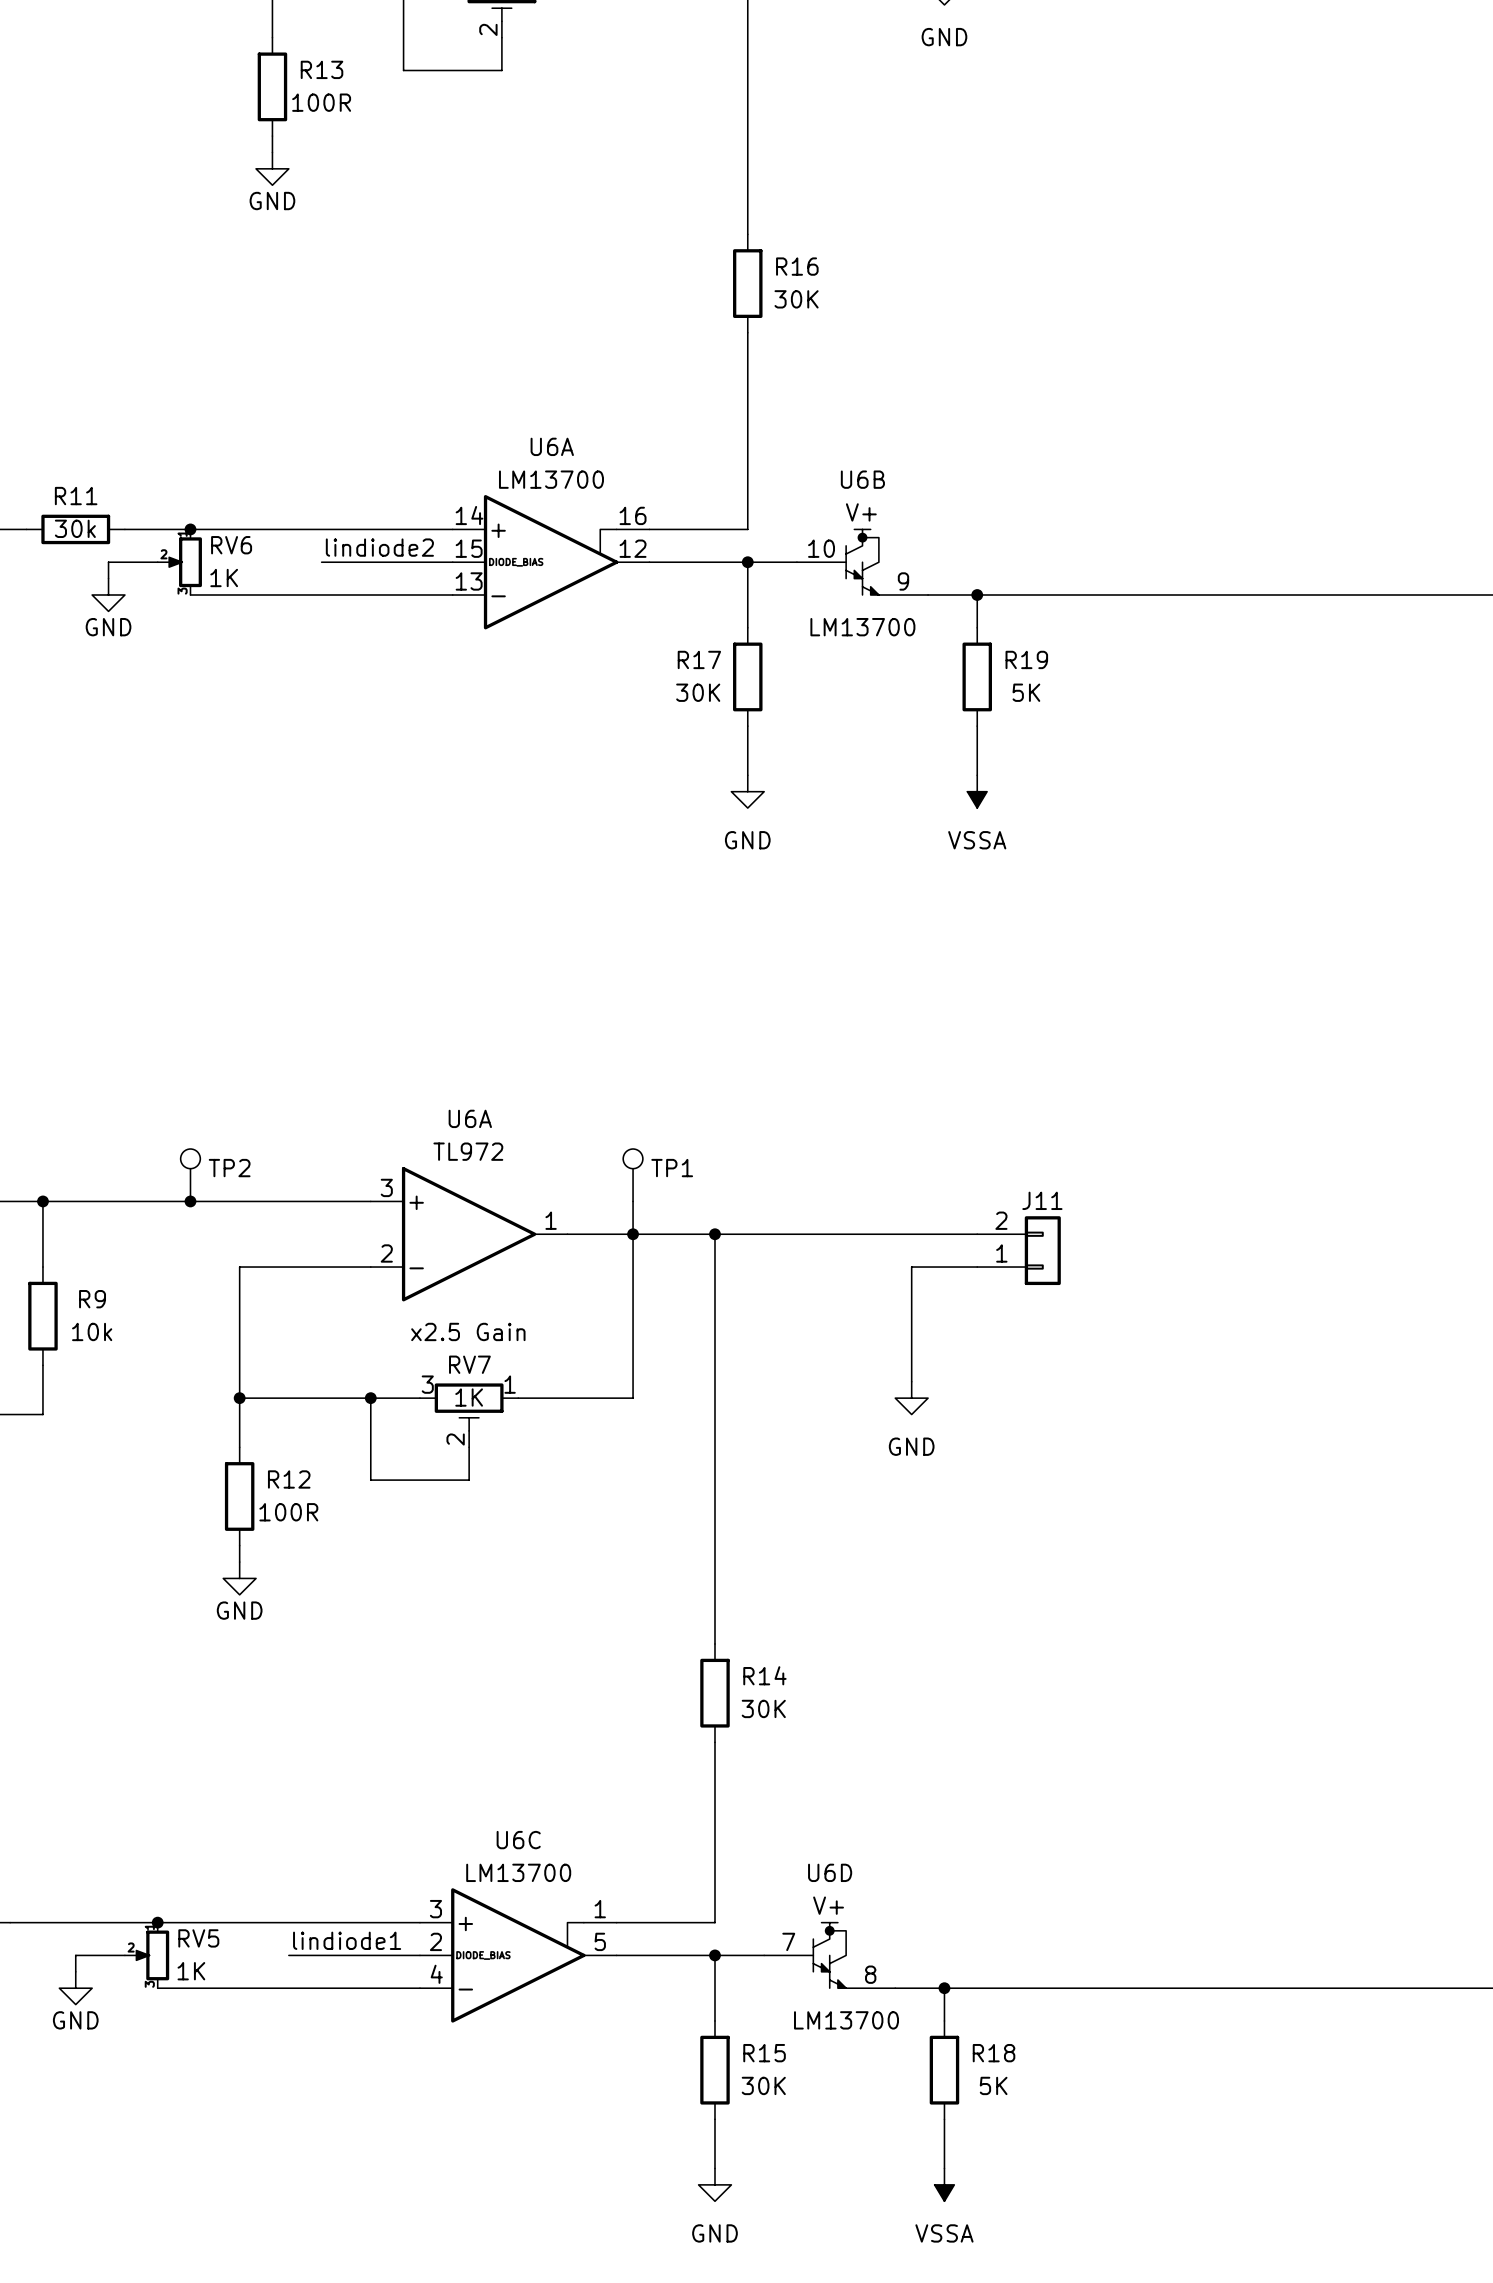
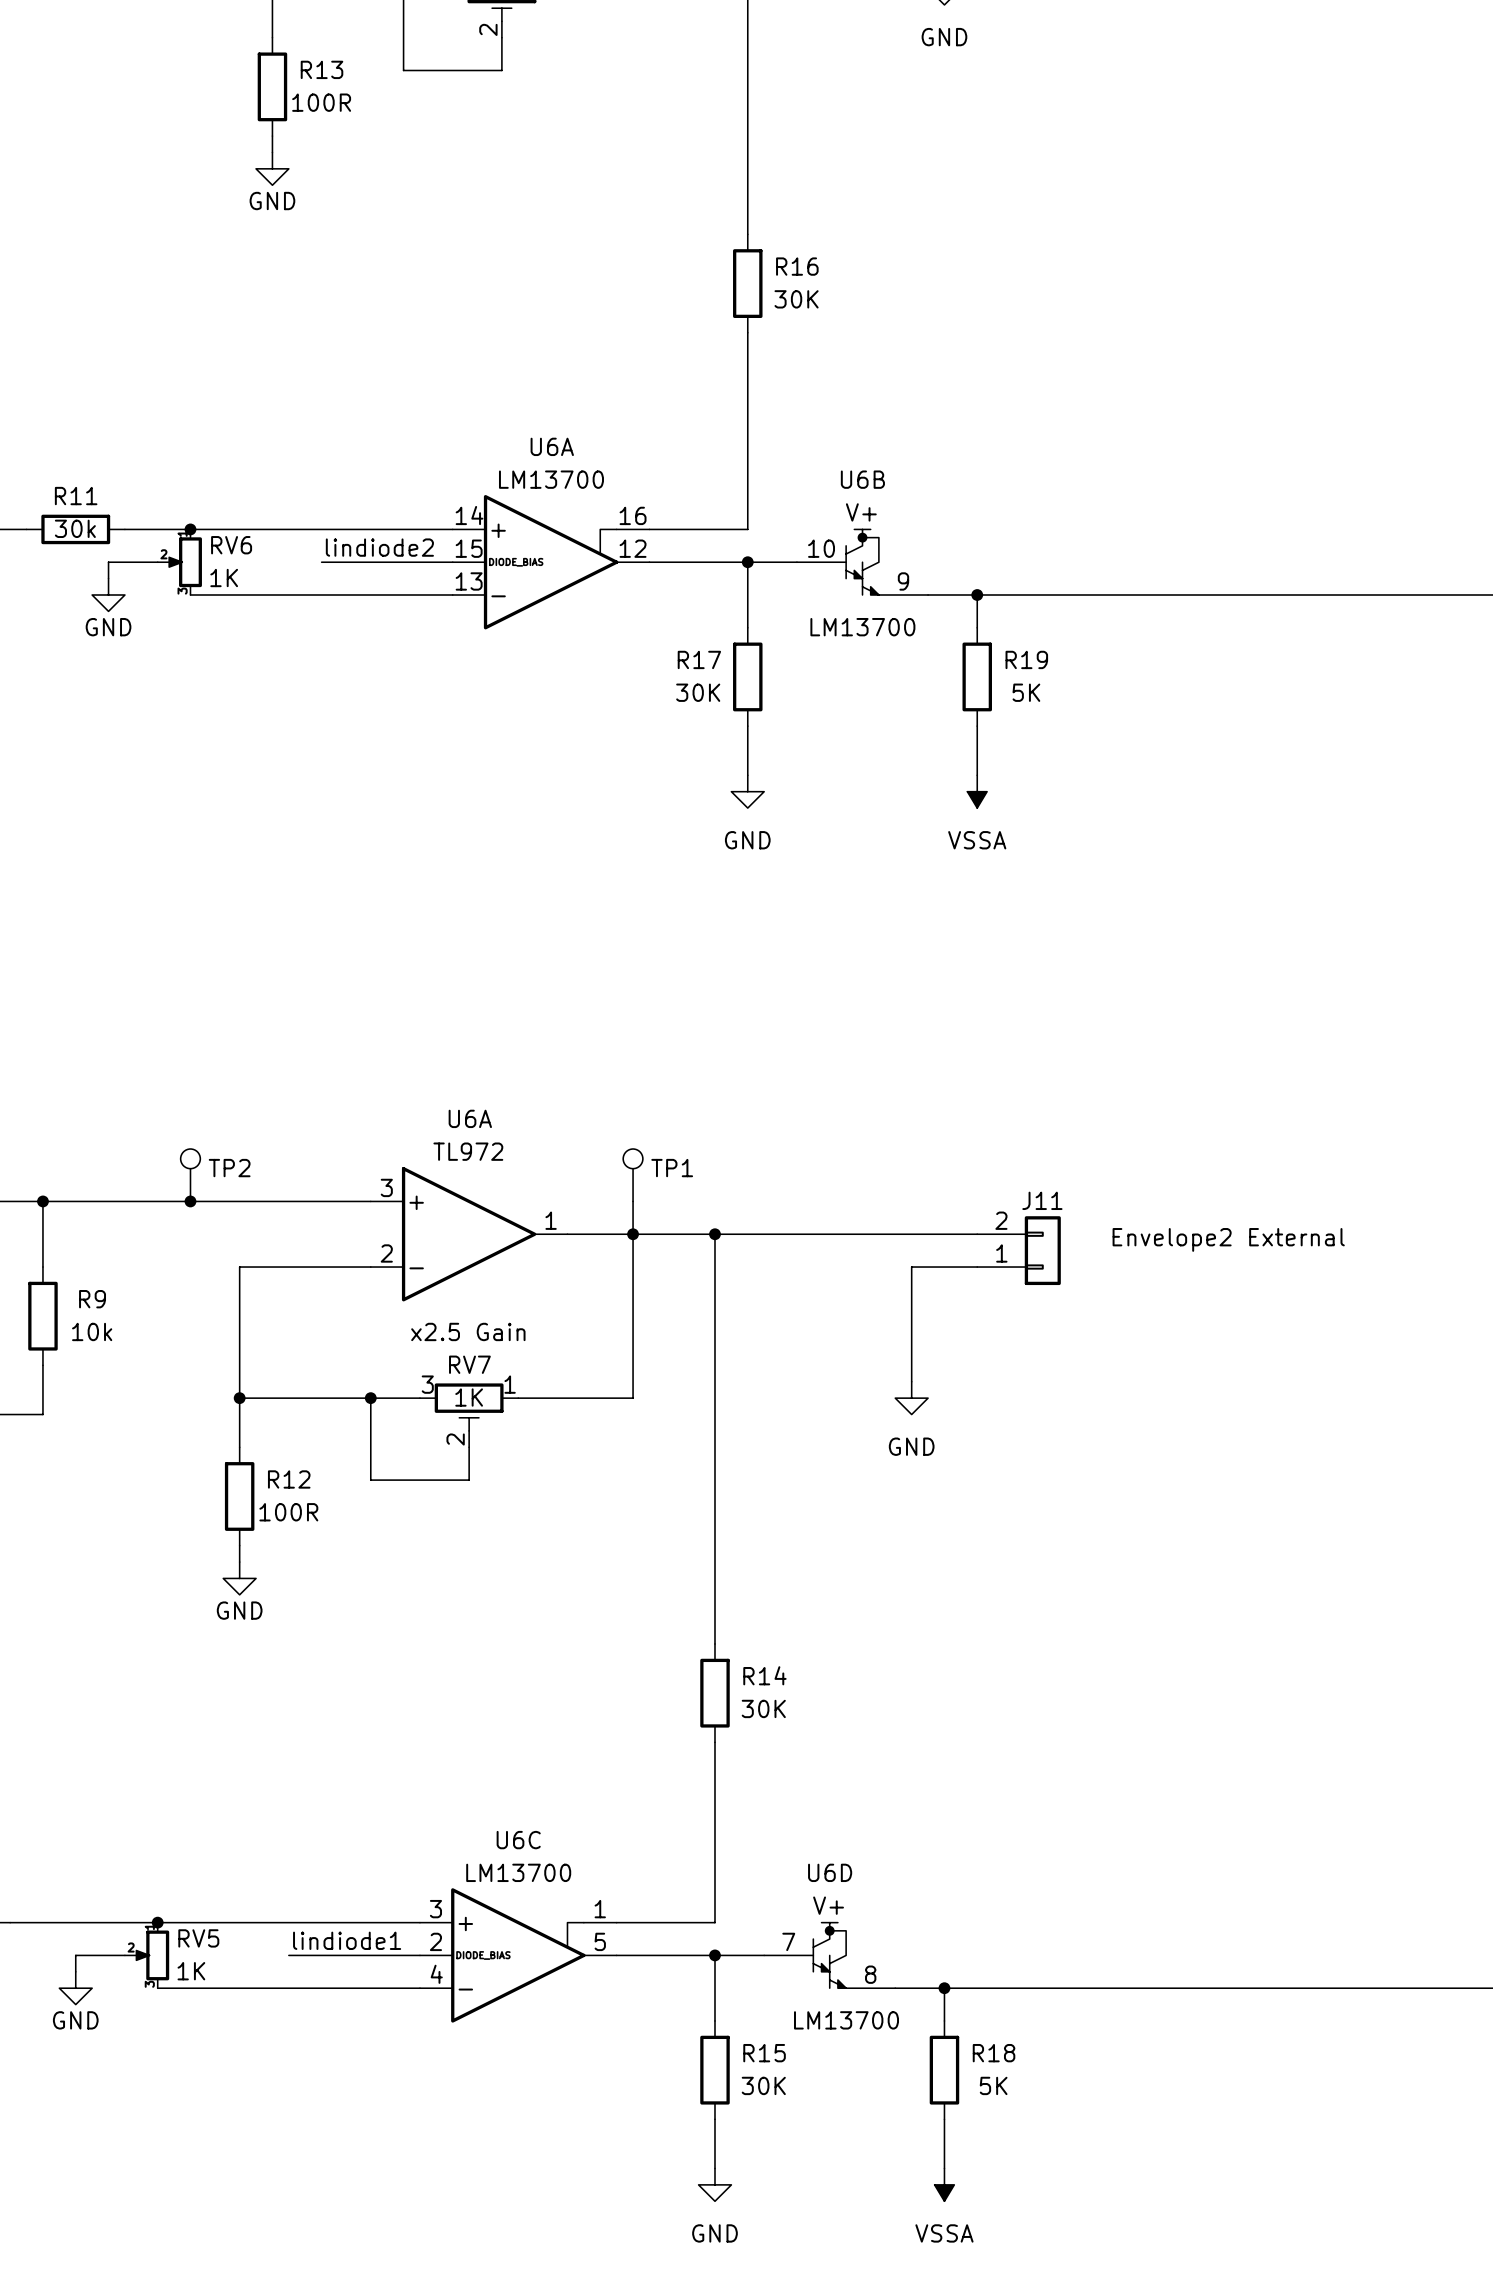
text: none -> Envelope2 External (1228, 1239)

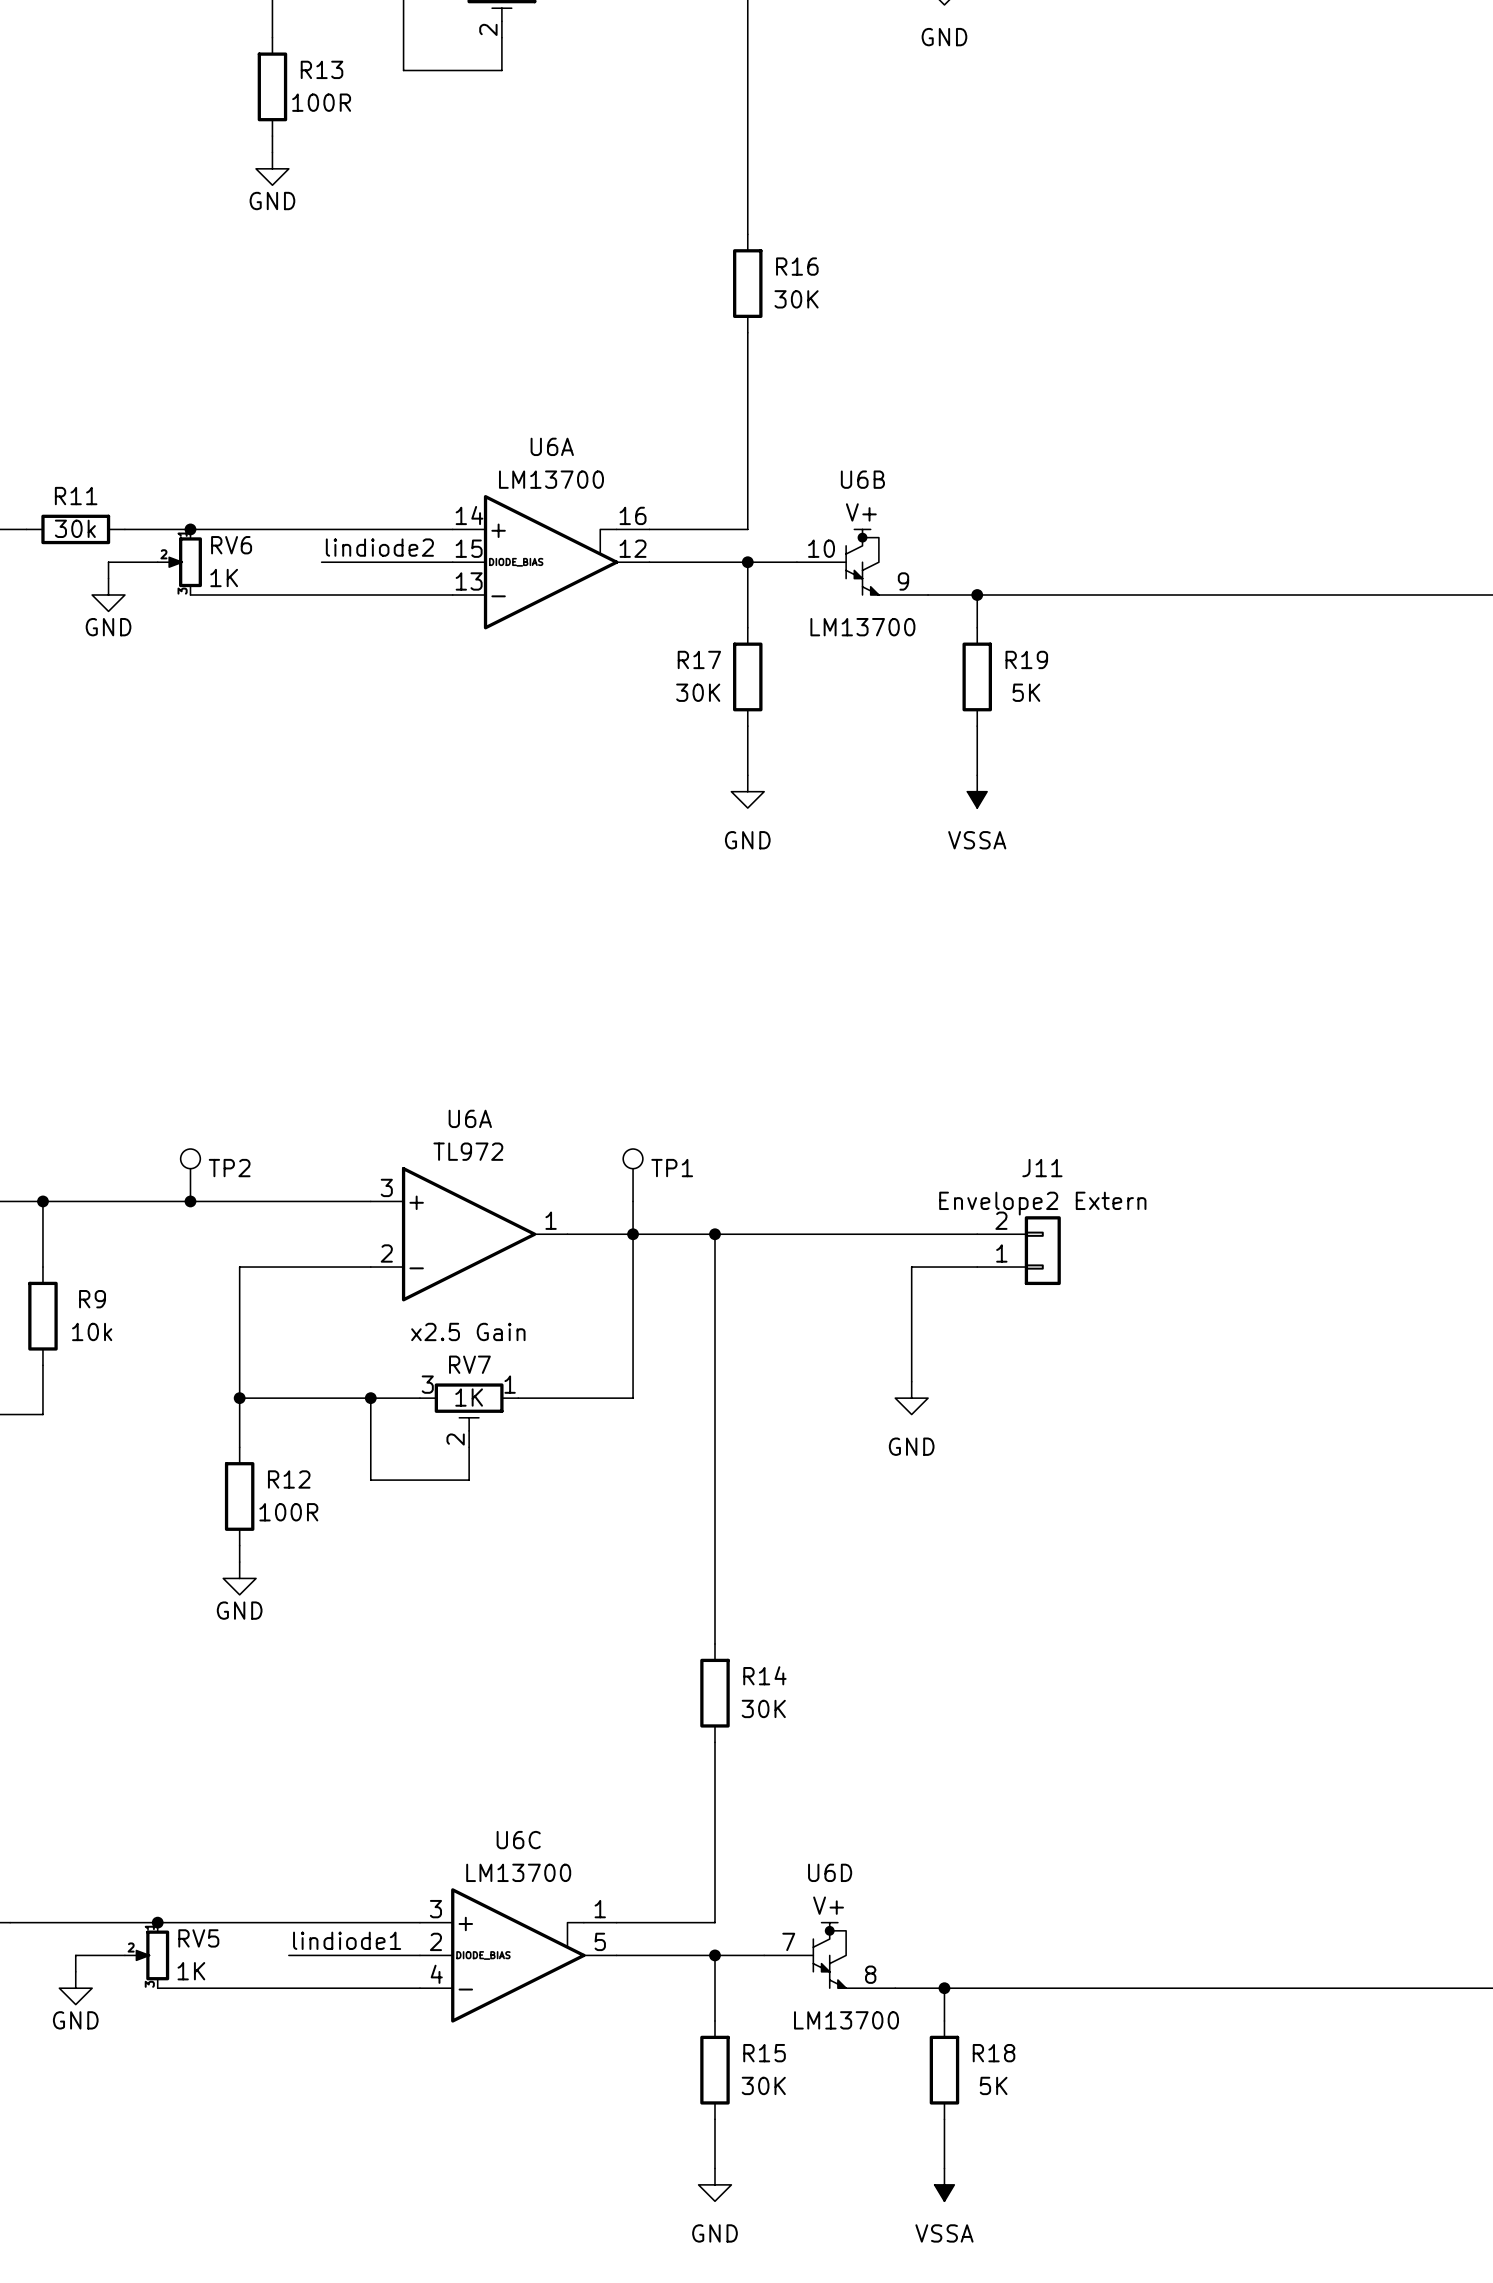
J11 name position: J11 (1042, 1200) -> J11 (1042, 1168)
J11 value: none -> Envelope2 Extern (1042, 1203)
text: Envelope2 External (1228, 1239) -> none

